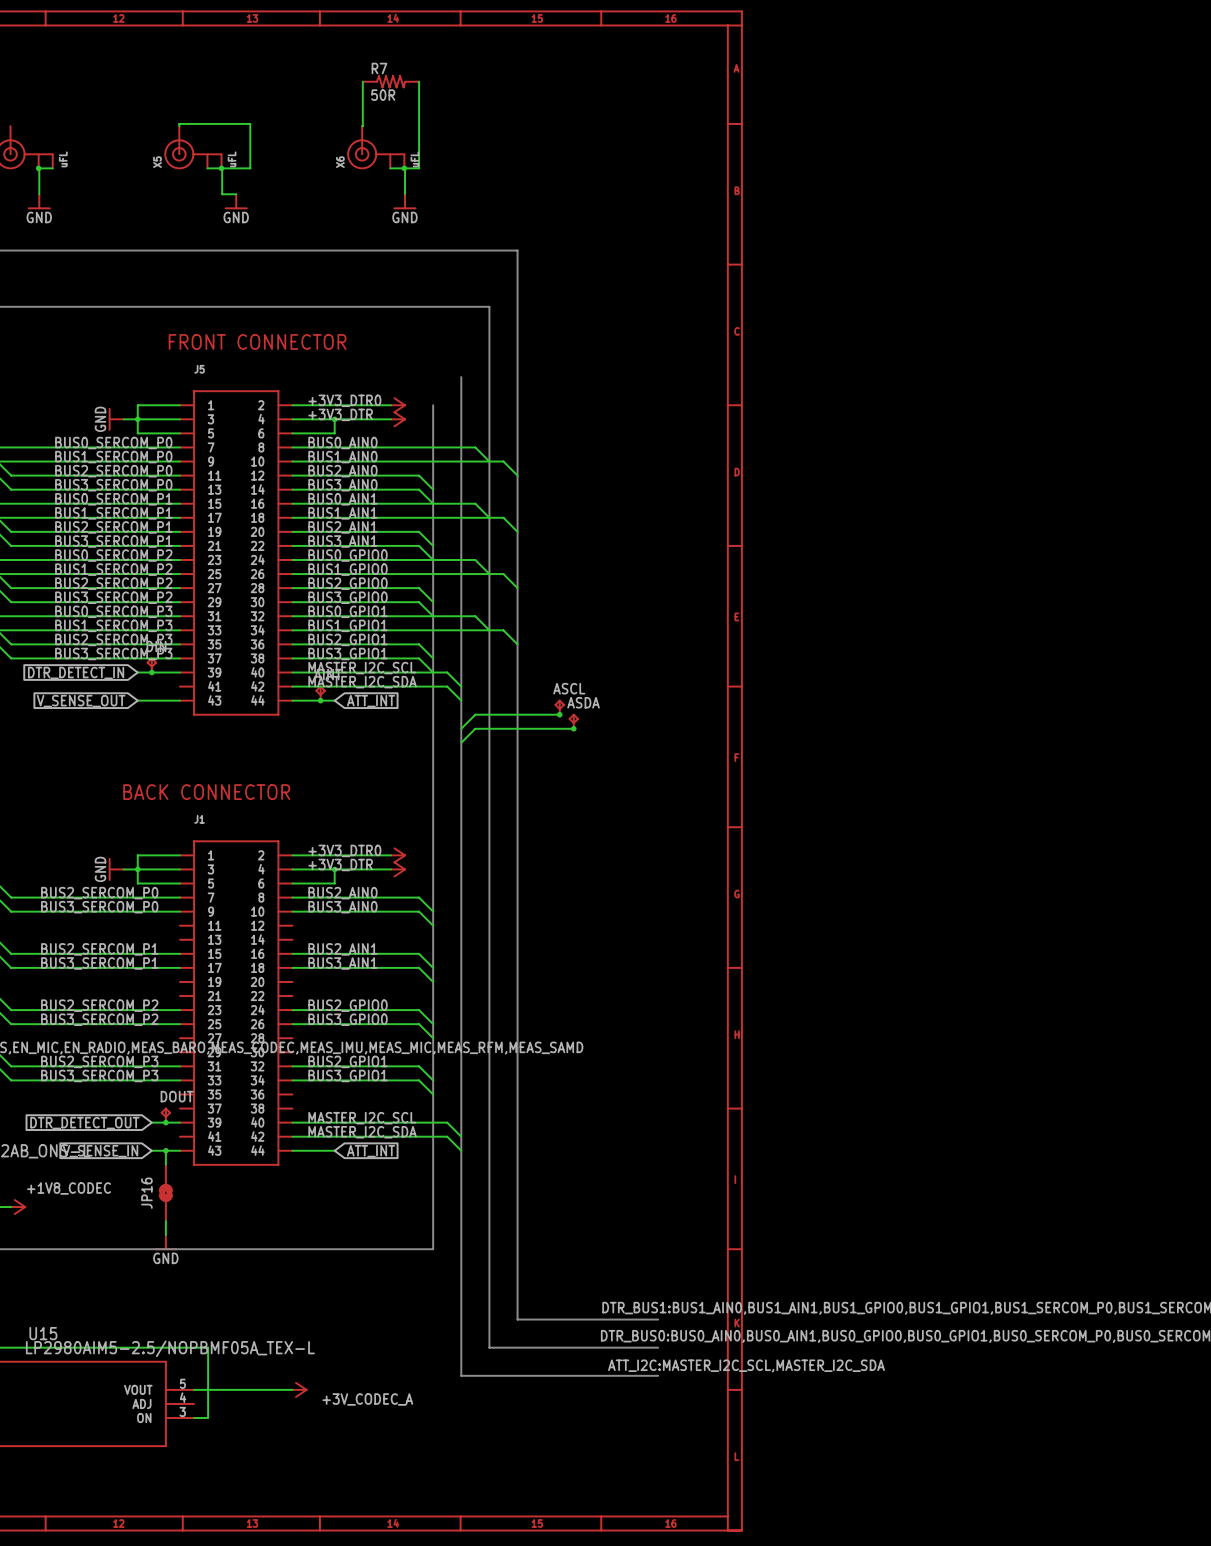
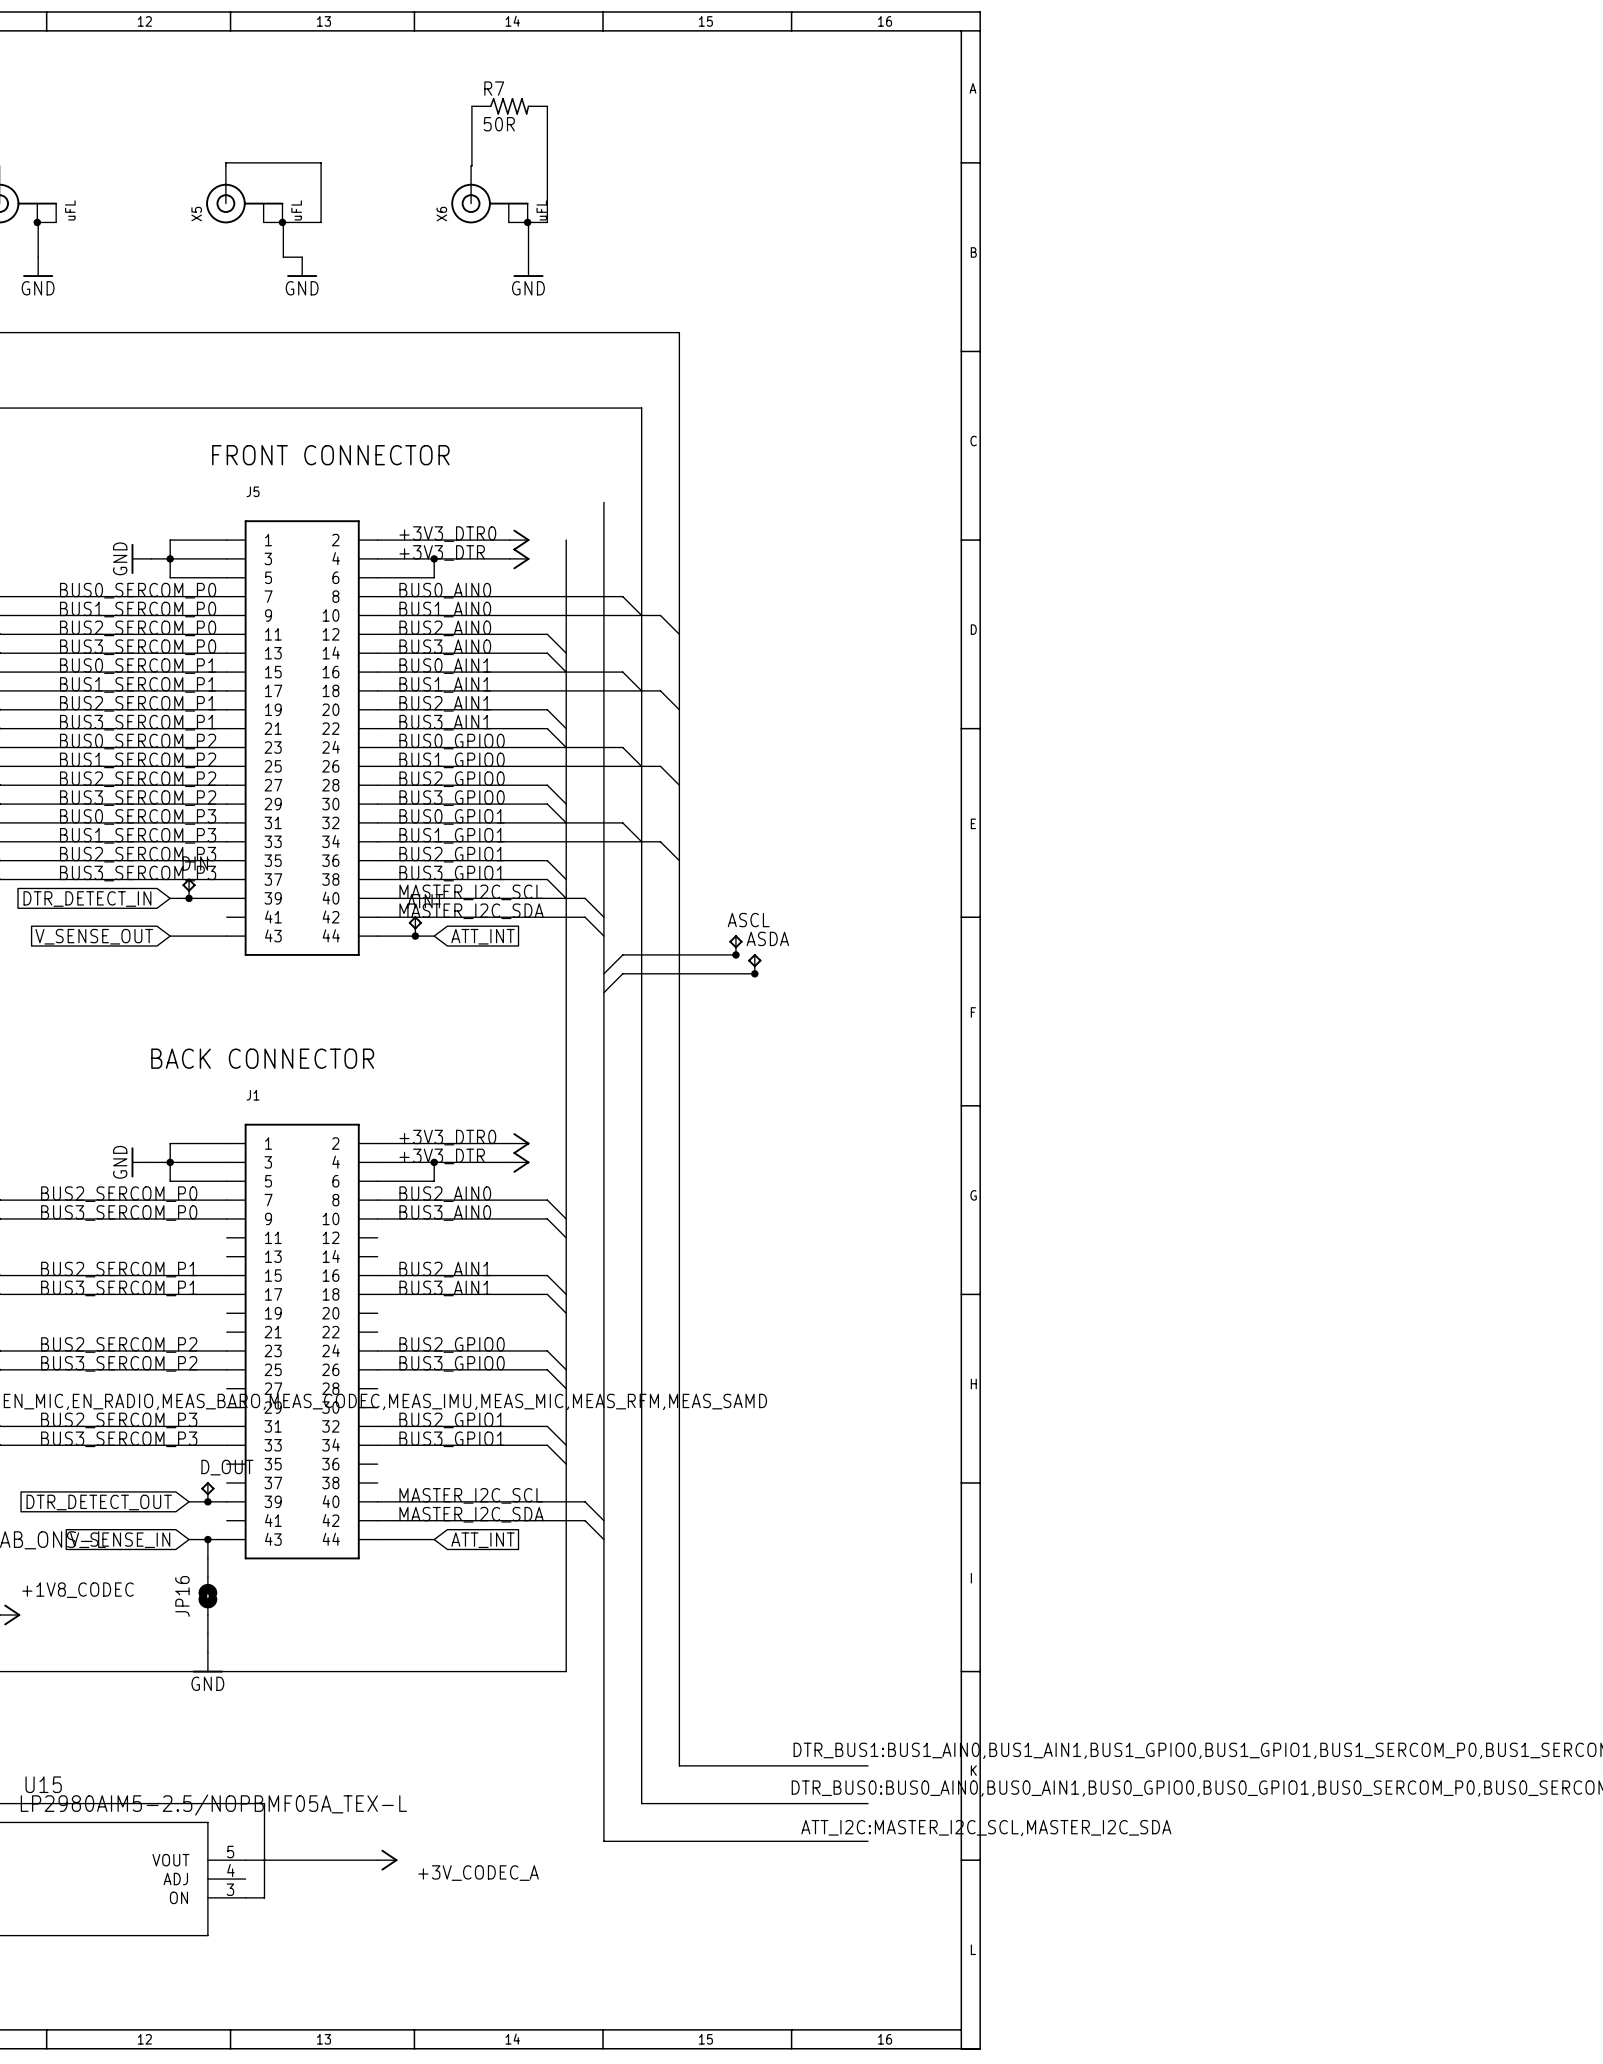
DOUT name: DOUT (177, 1096) -> D_OUT (227, 1467)

